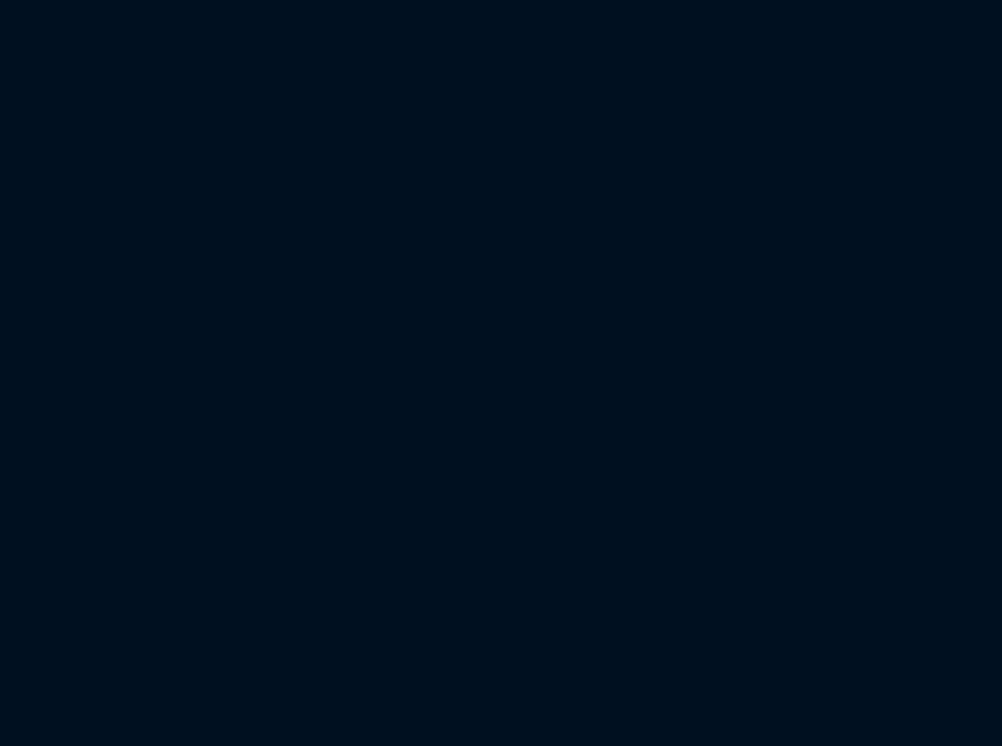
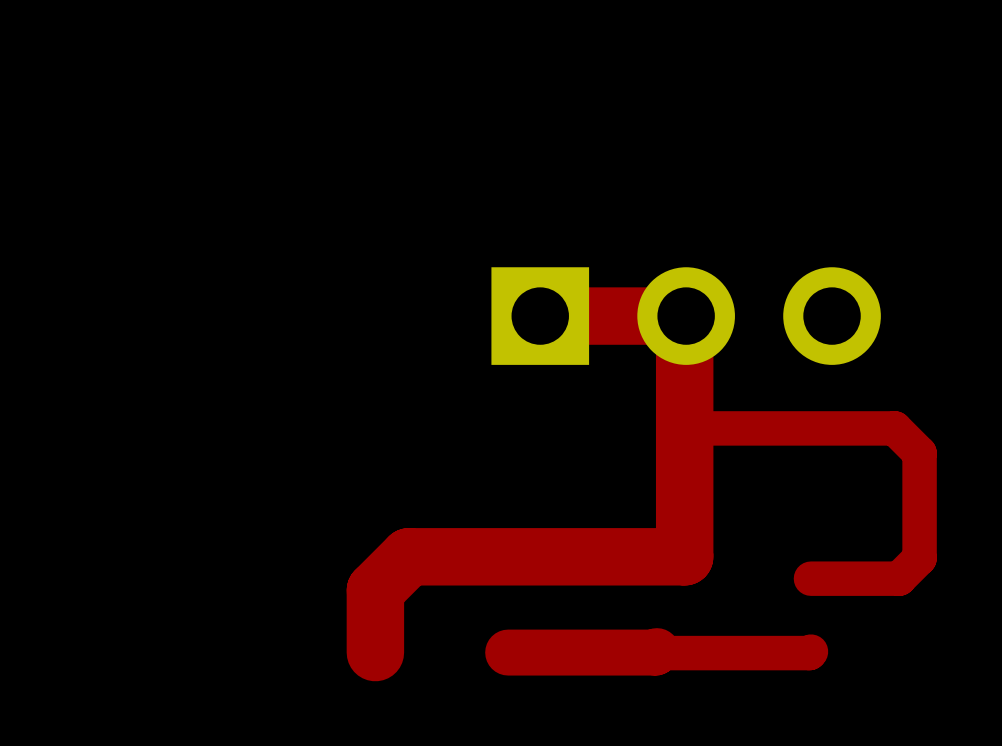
top track: none -> (540, 316) (686, 316) (684, 556) (408, 556) (375, 590) (375, 652)
part: none -> (686, 316)
top track: none -> (689, 428) (894, 428) (919, 453) (919, 558) (899, 578) (810, 578)
top track: none -> (810, 651) (508, 652)

